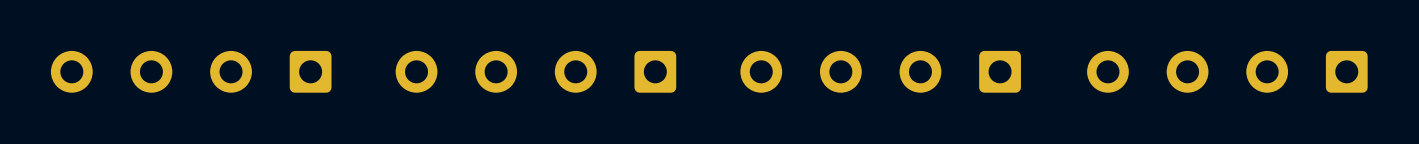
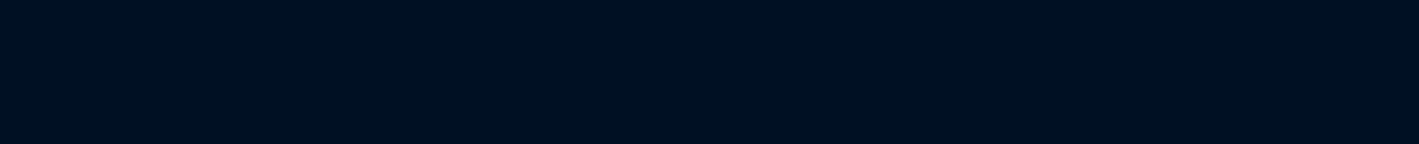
part: (191, 71) -> none
part: (535, 71) -> none
part: (880, 71) -> none
part: (1227, 71) -> none

